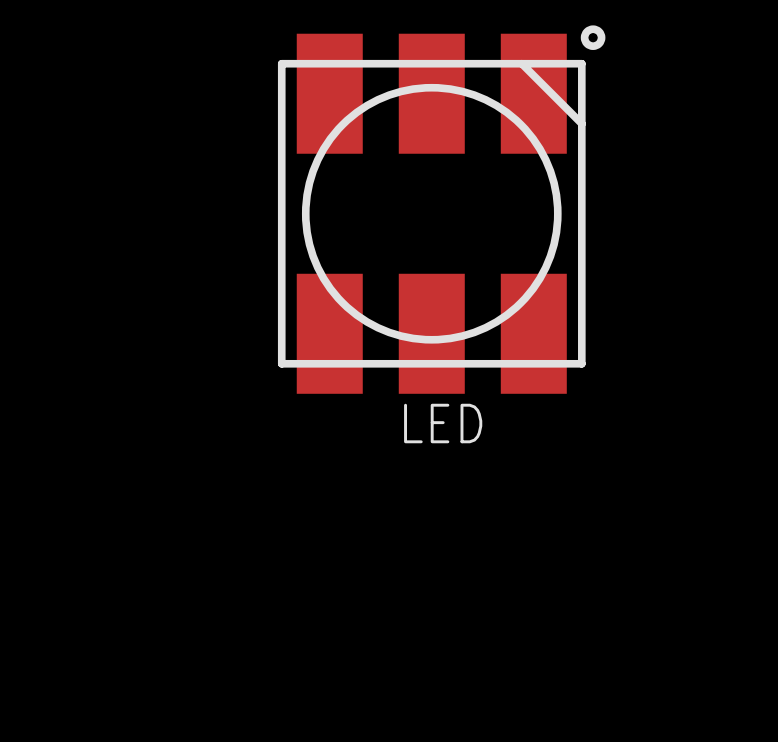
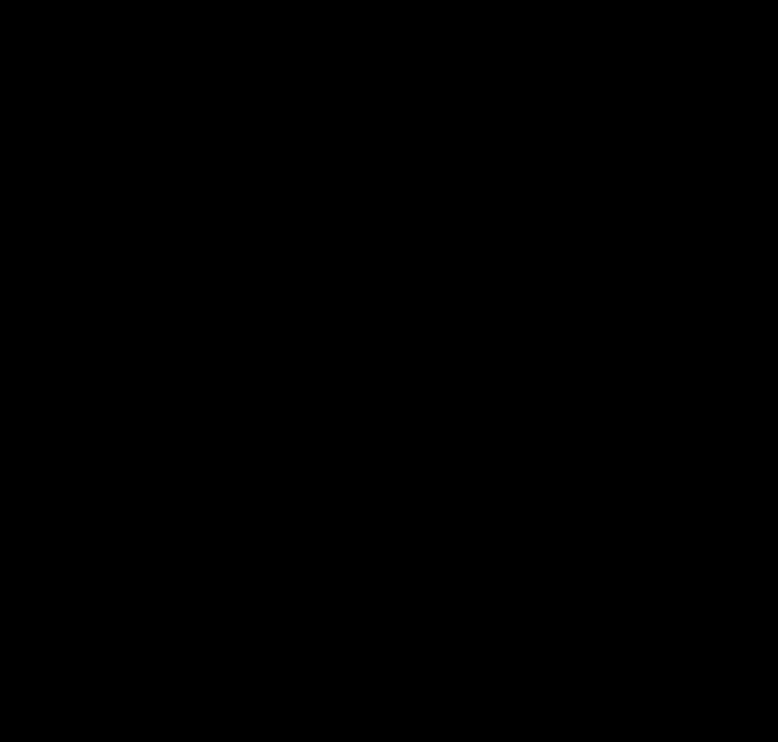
LED: (441, 209) -> none

